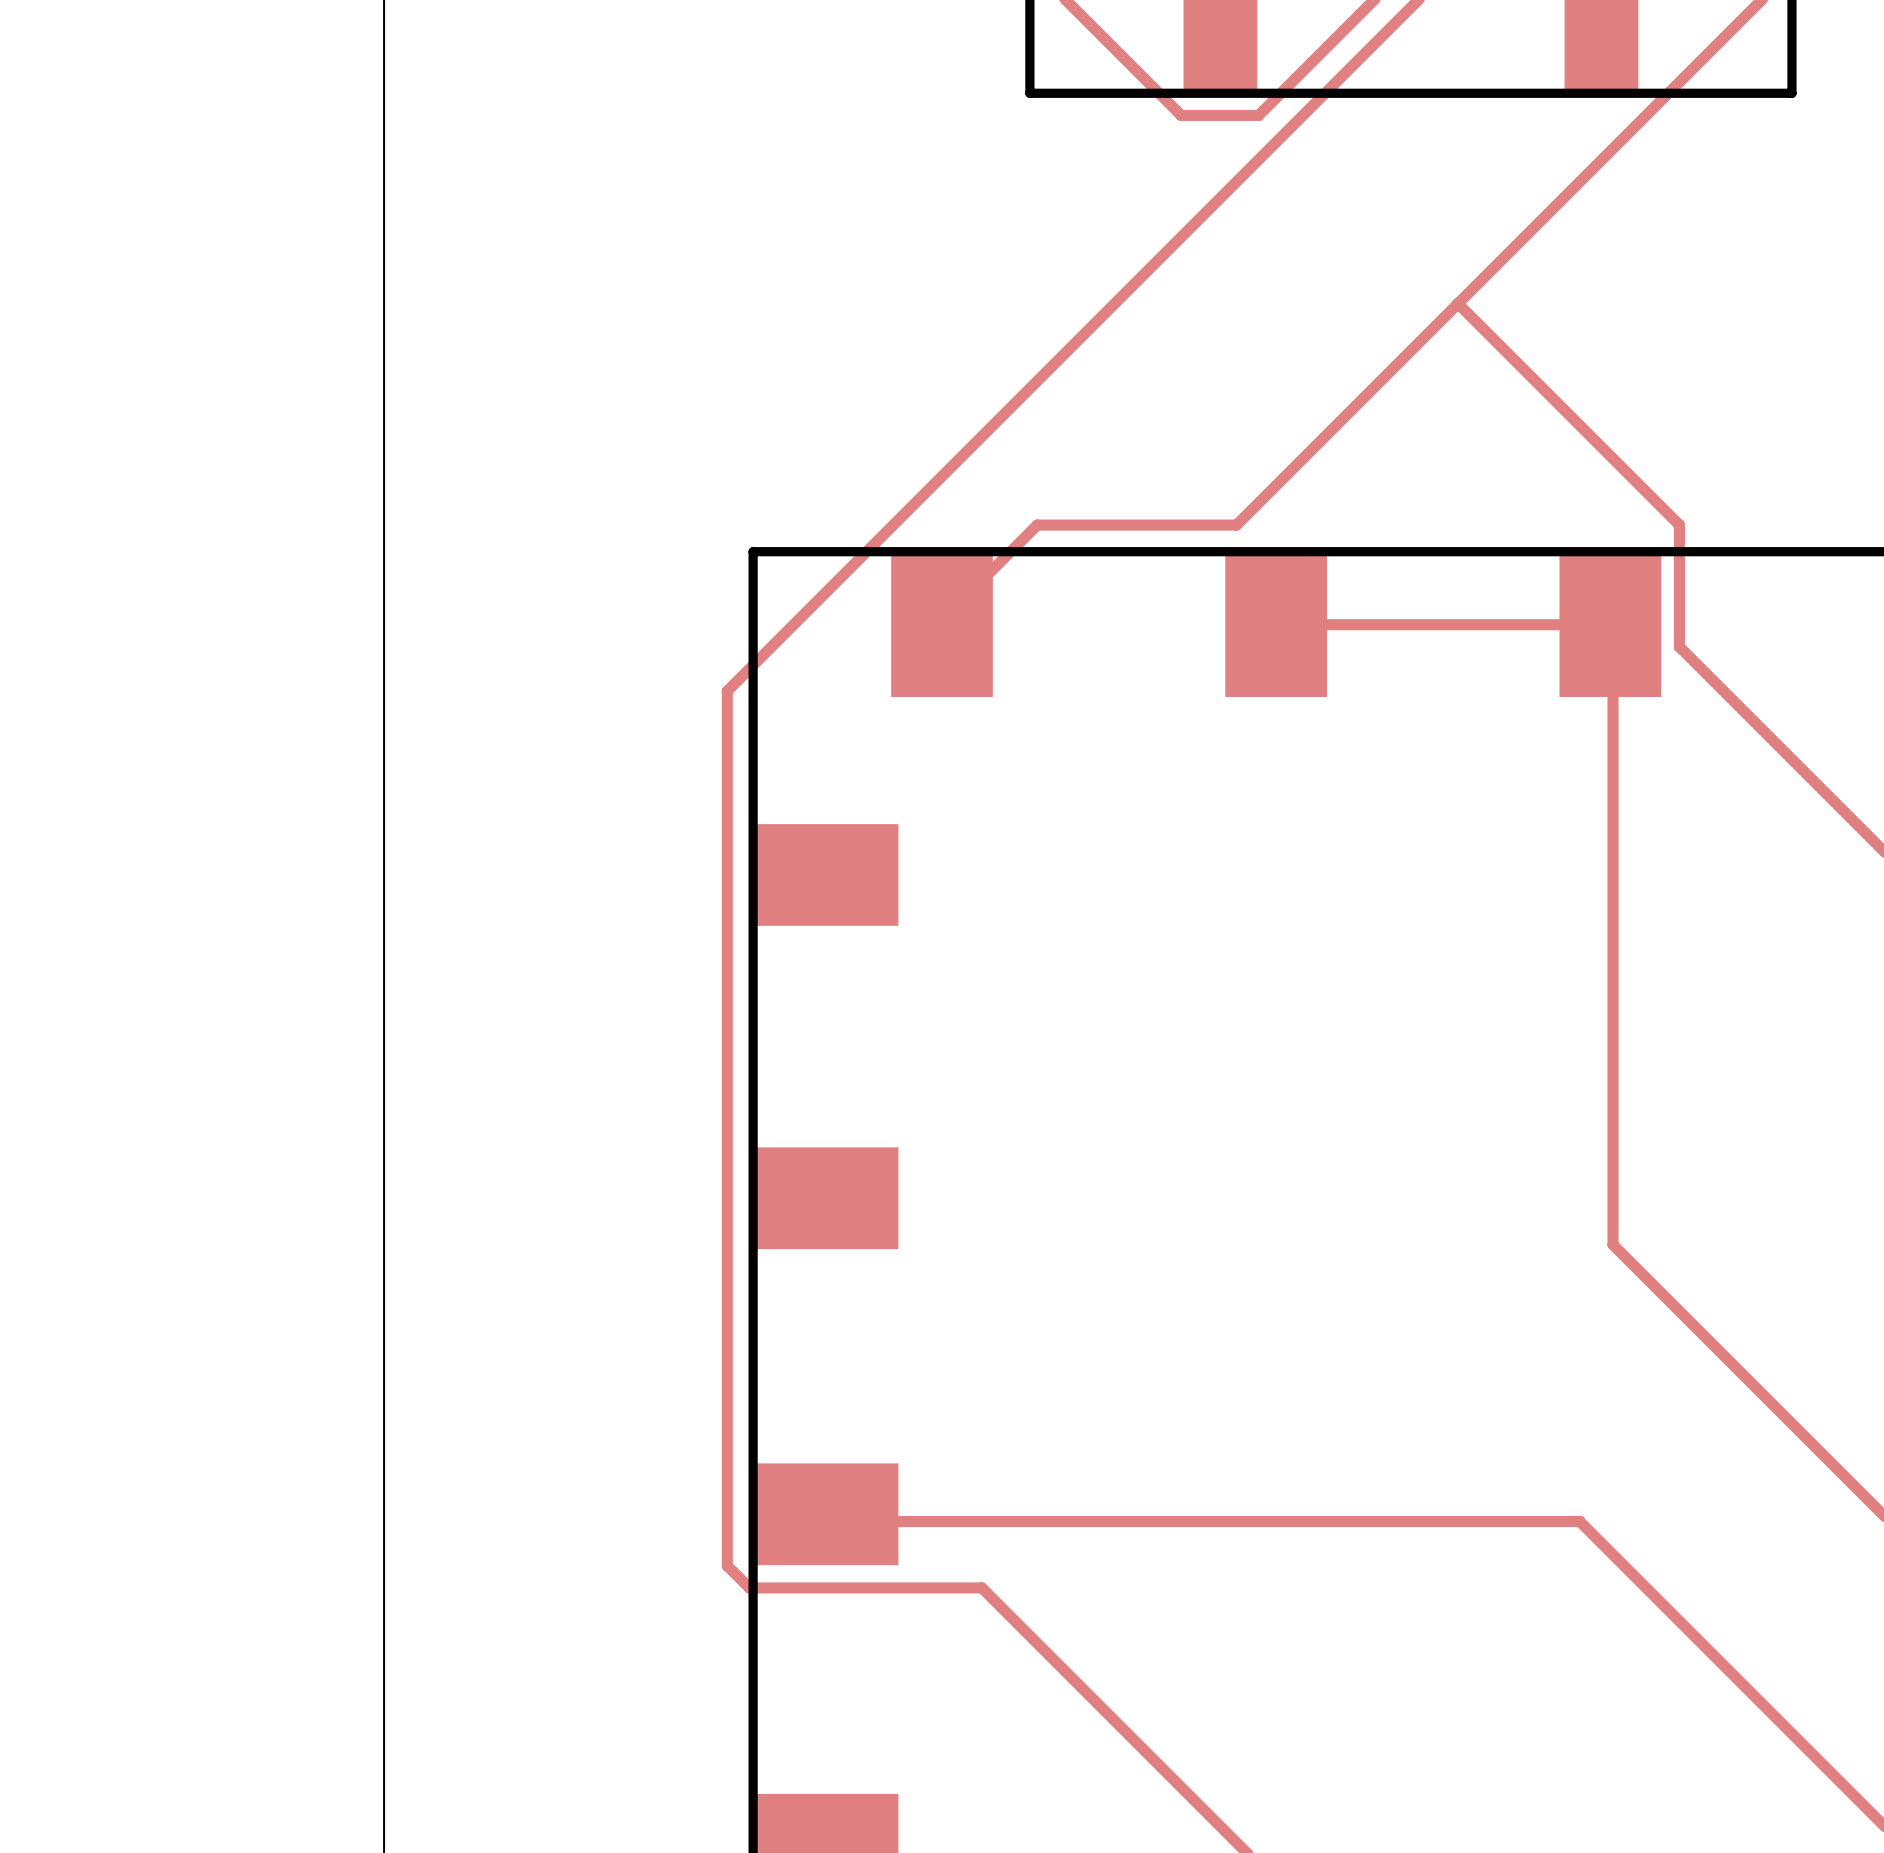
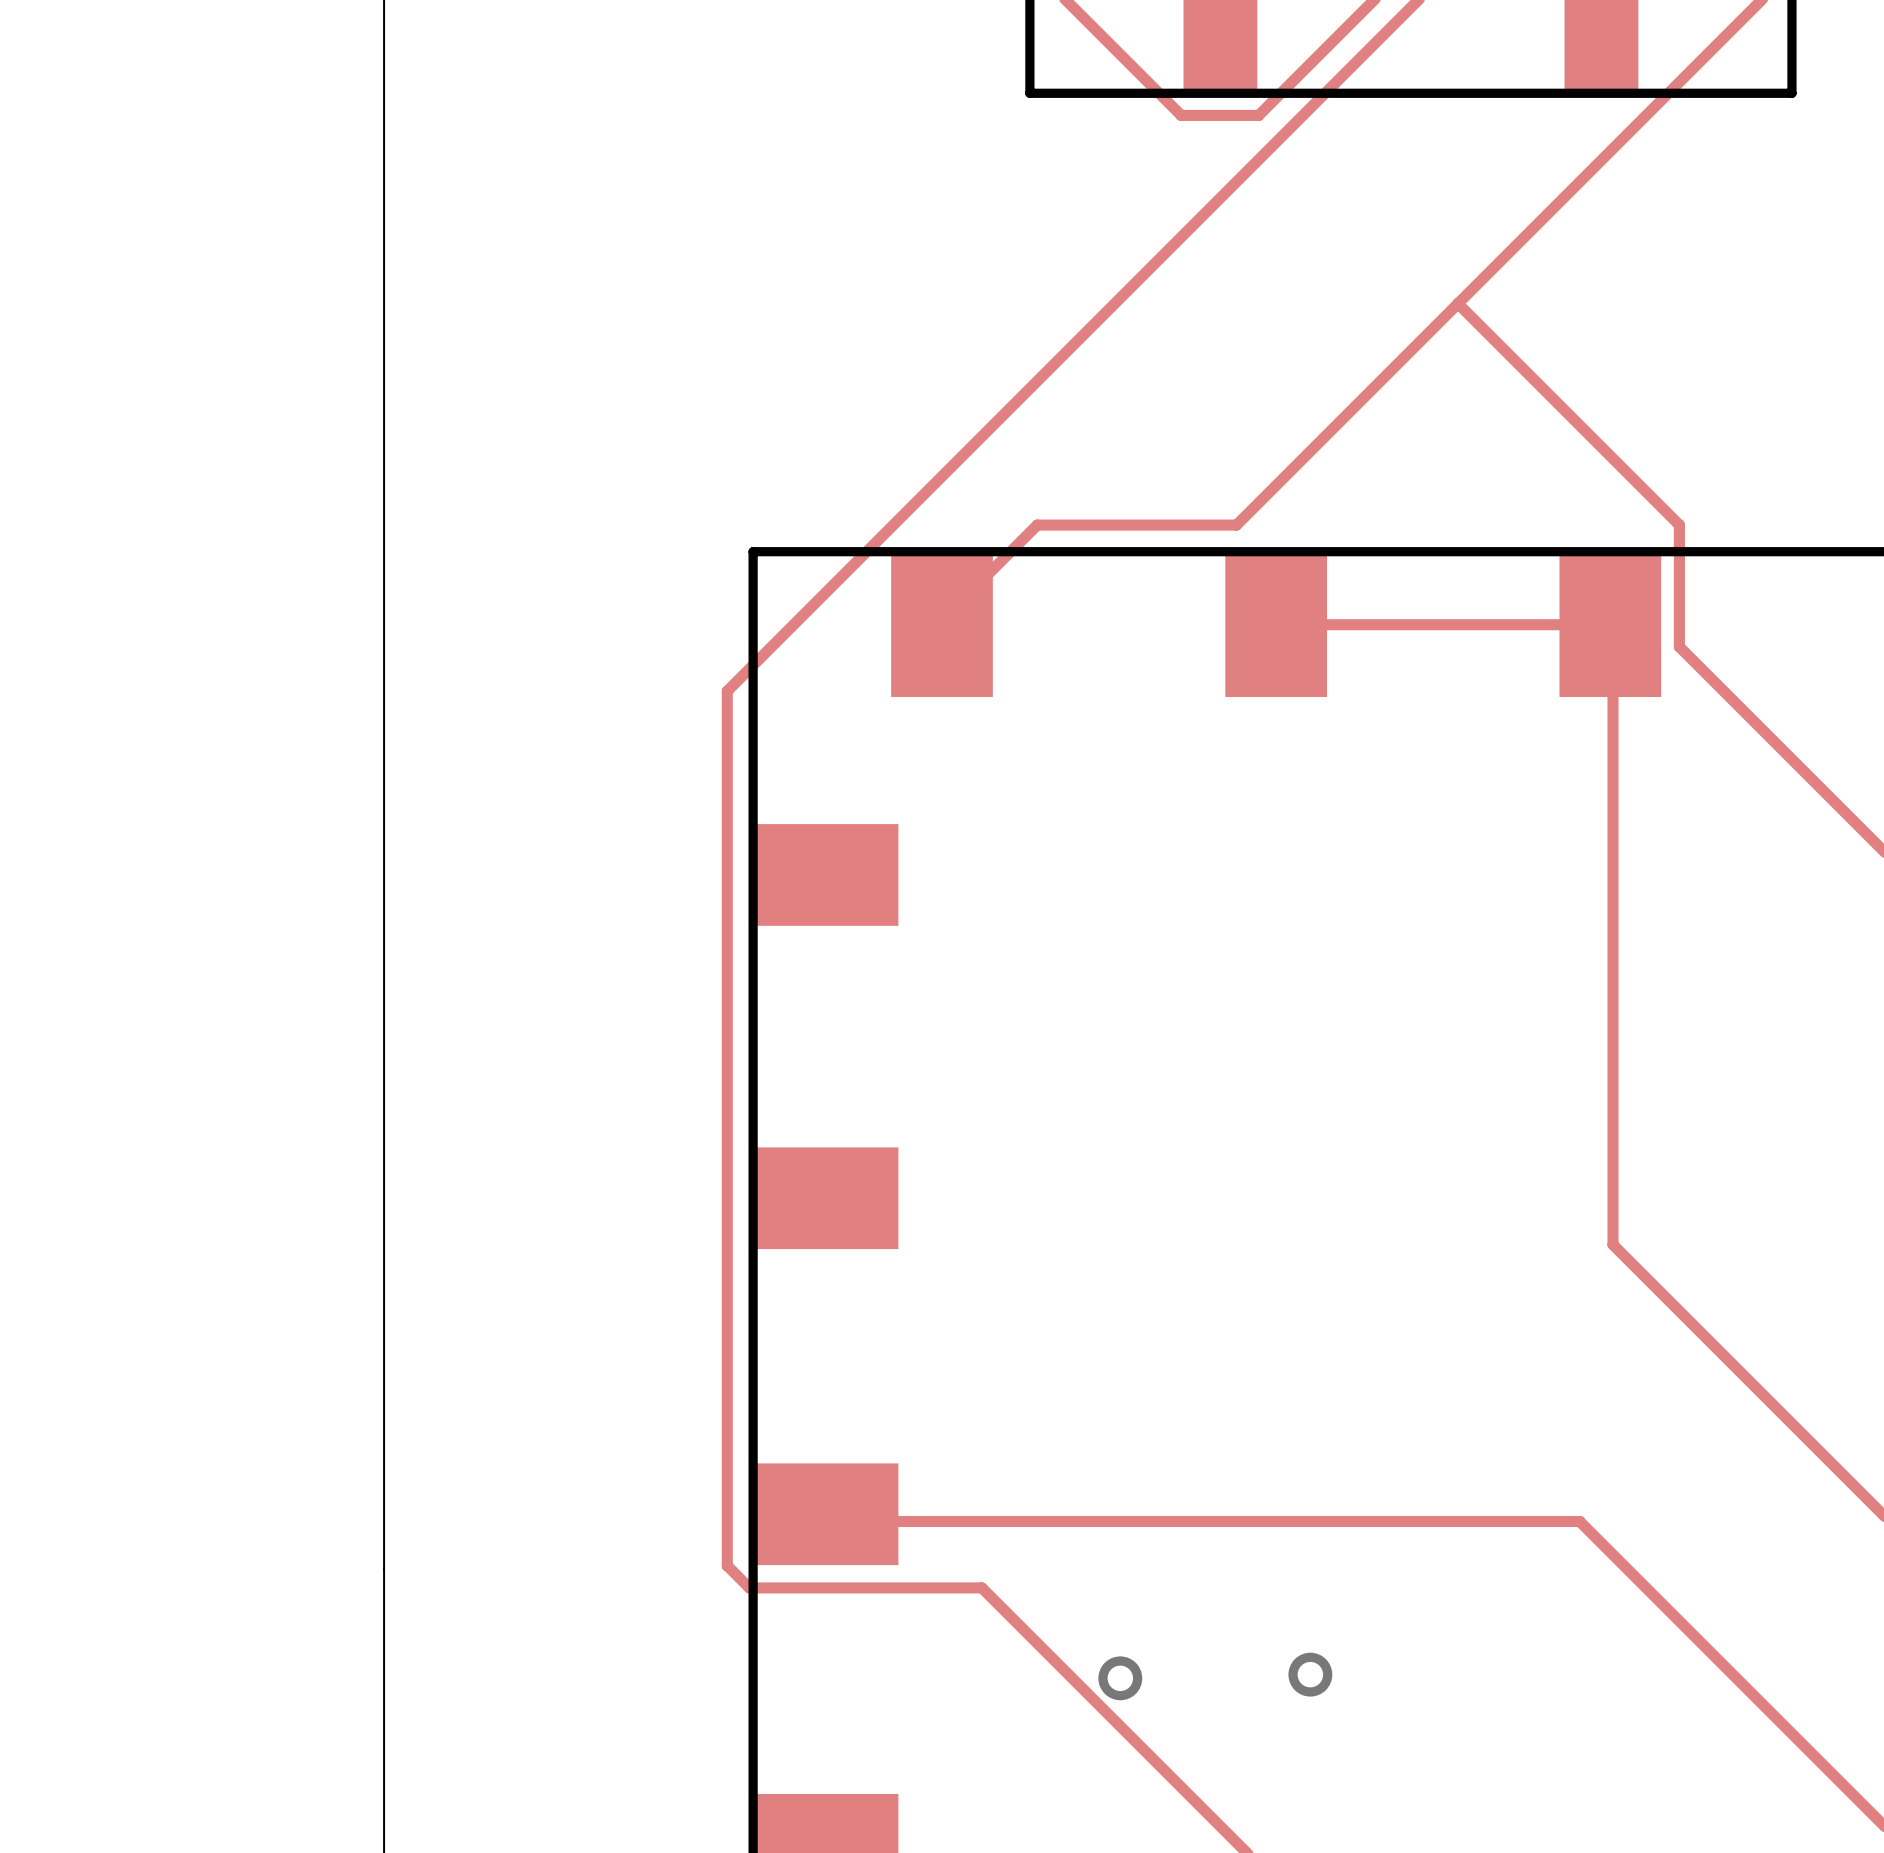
via: none -> (1310, 1674)
via: none -> (1120, 1678)

